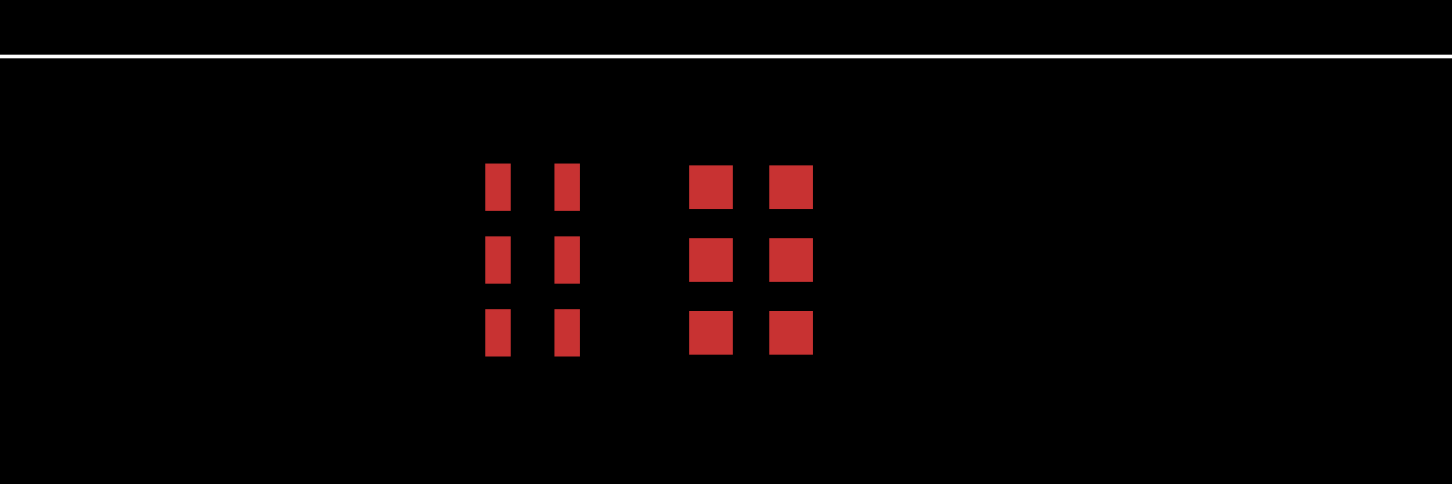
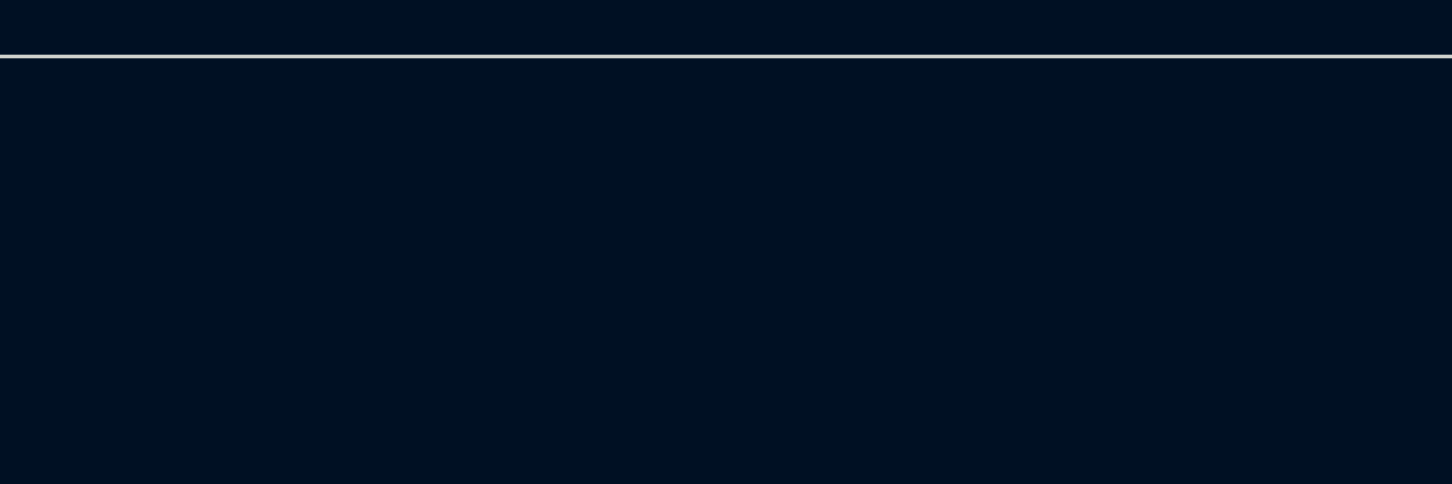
part: (532, 187) -> none
part: (751, 187) -> none
part: (532, 260) -> none
part: (751, 260) -> none
part: (532, 332) -> none
part: (751, 332) -> none

